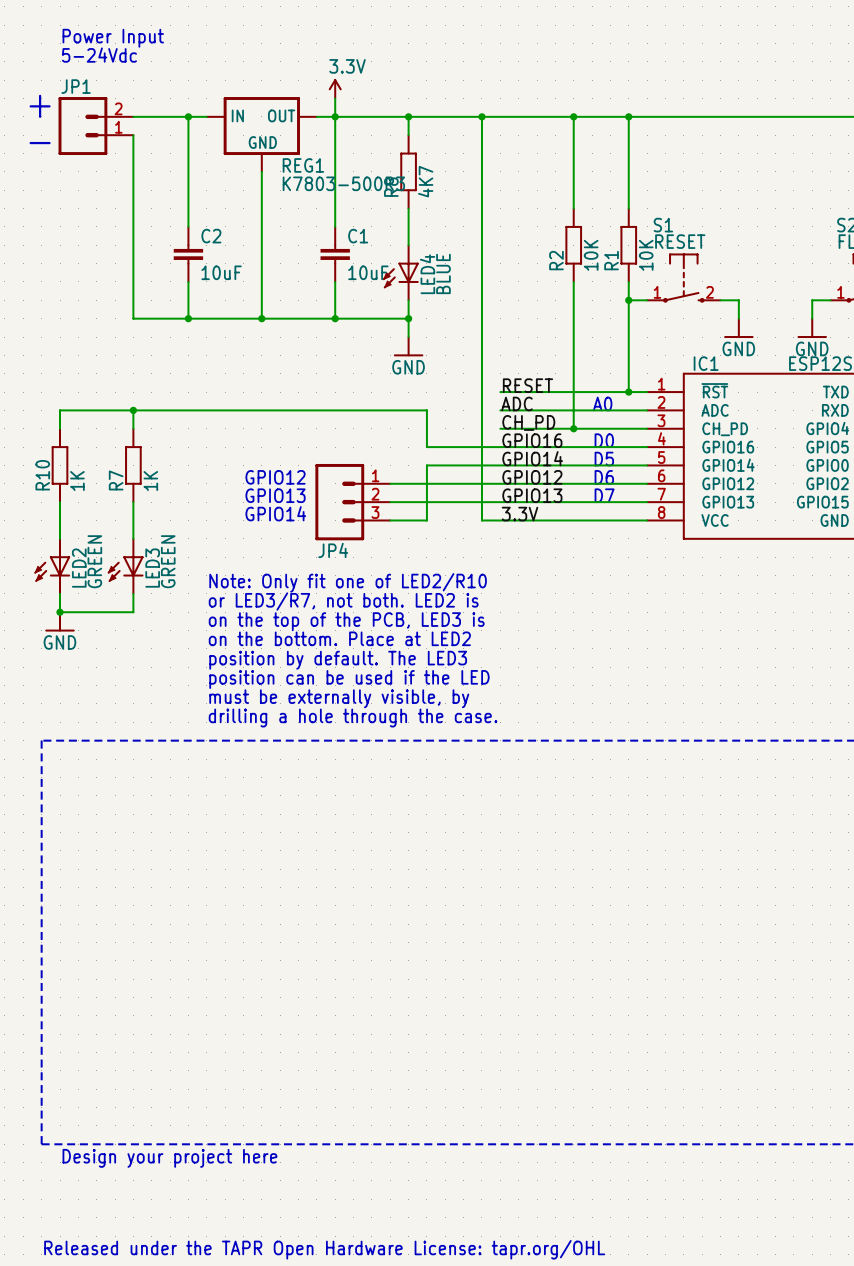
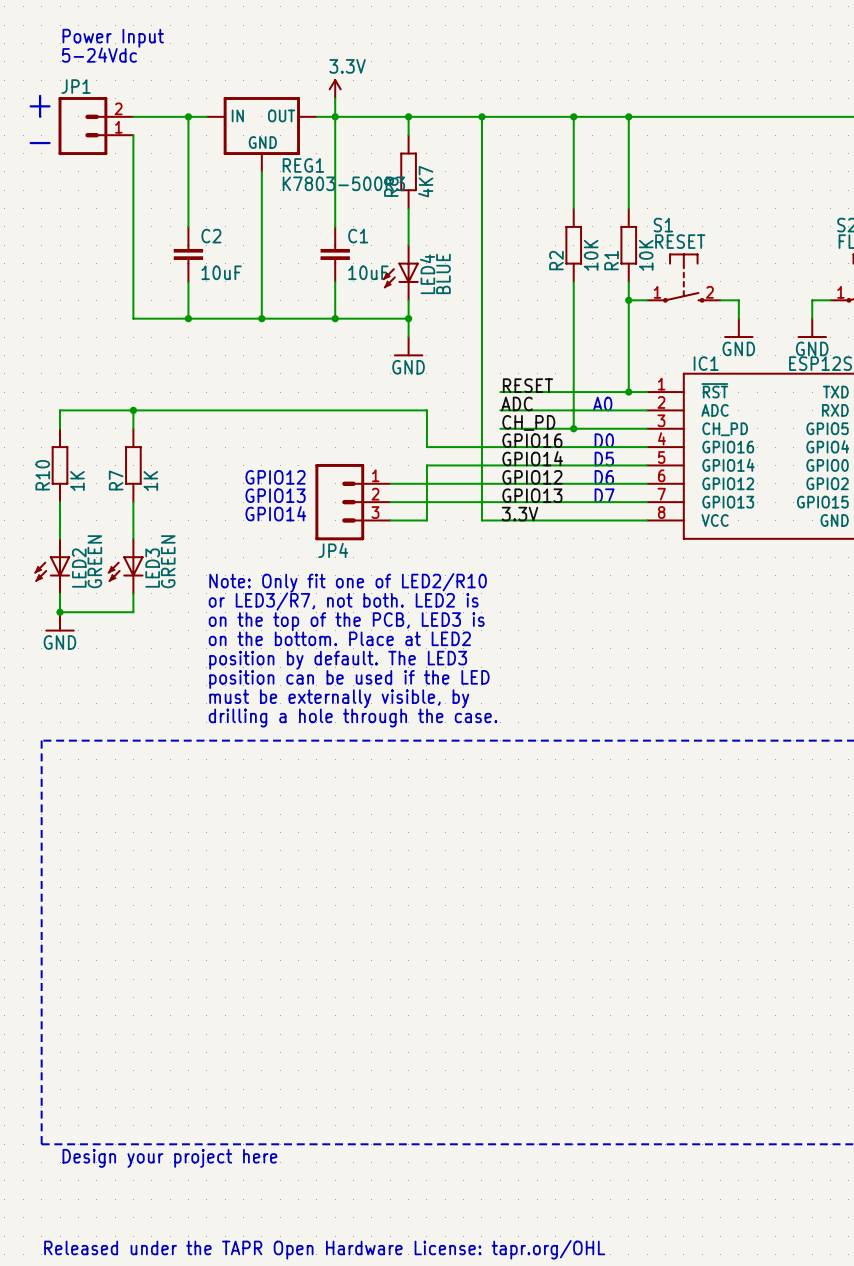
IC1 pin name: GPIO4 (827, 428) -> GPIO5 (827, 428)
IC1 pin name: GPIO5 (827, 447) -> GPIO4 (827, 446)

